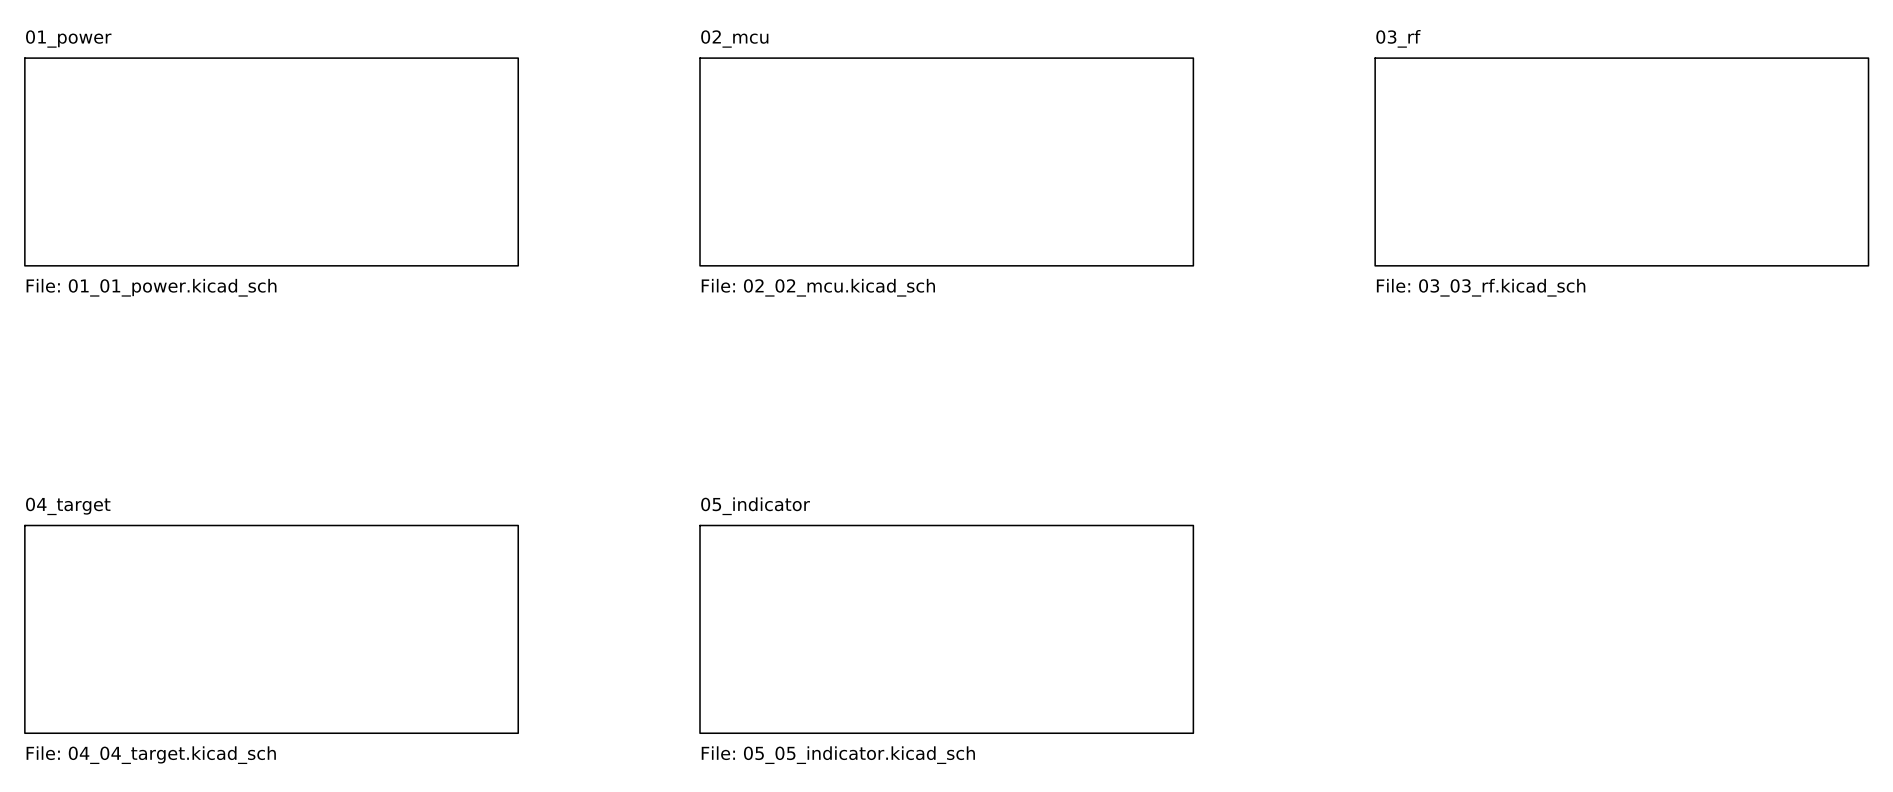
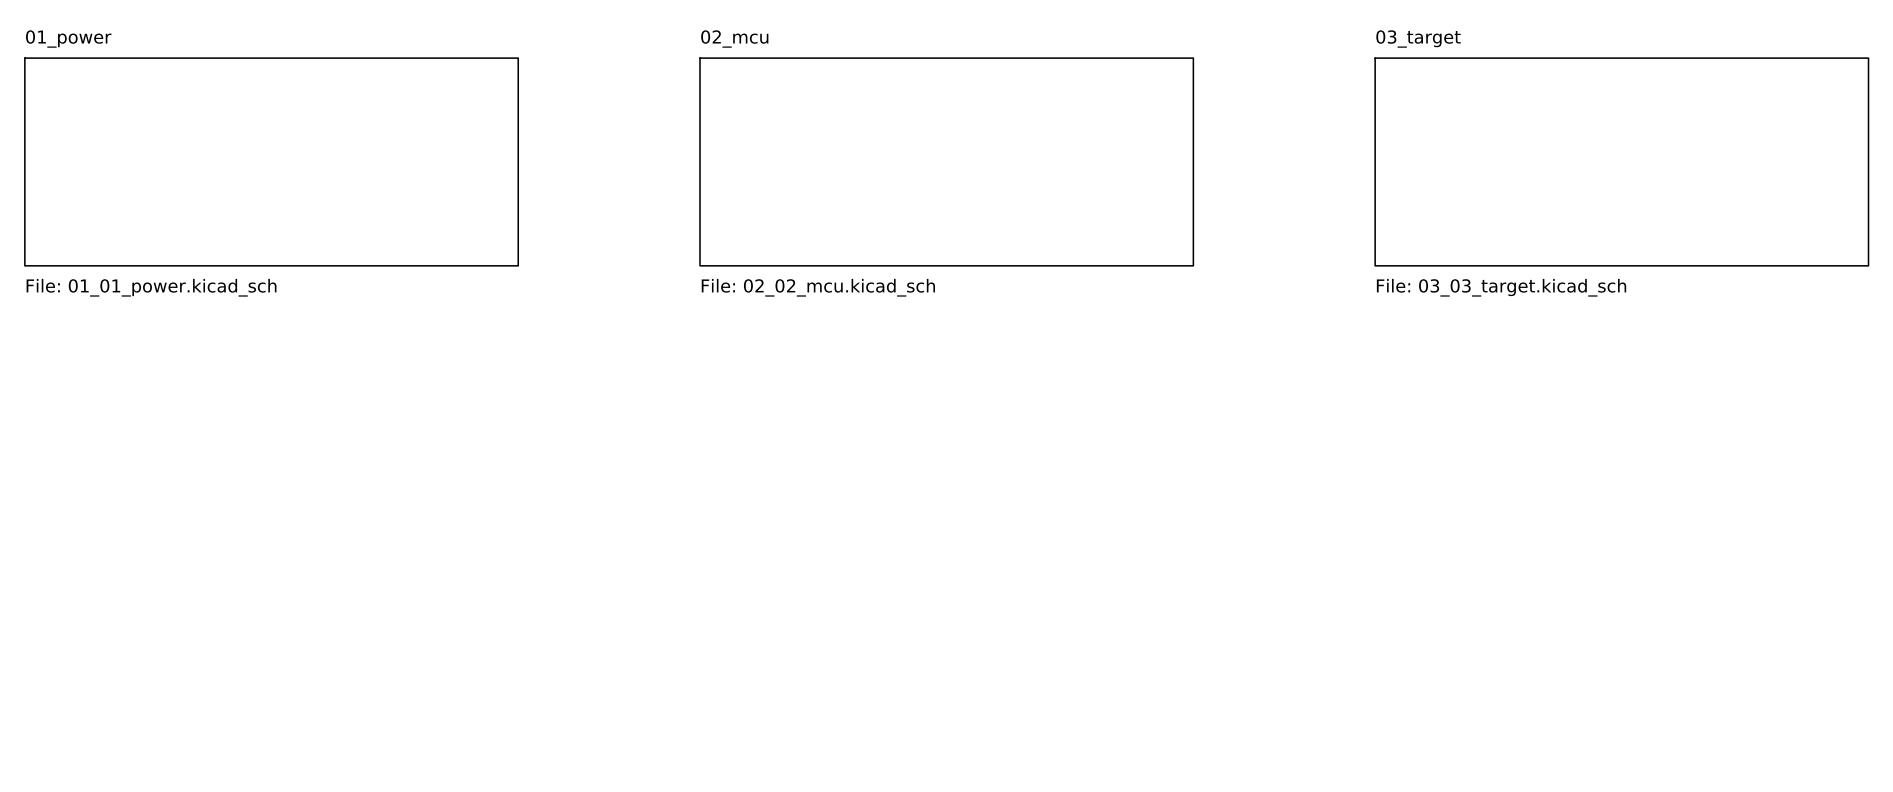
sheet 03_rf name: 03_rf (1398, 38) -> 03_target (1418, 39)
sheet 03_rf value: File: 03_03_rf.kicad_sch (1481, 287) -> File: 03_03_target.kicad_sch (1501, 287)
sheet 04_target: File: 04_04_target.kicad_sch (271, 629) -> none
sheet 05_indicator: File: 05_05_indicator.kicad_sch (946, 629) -> none

